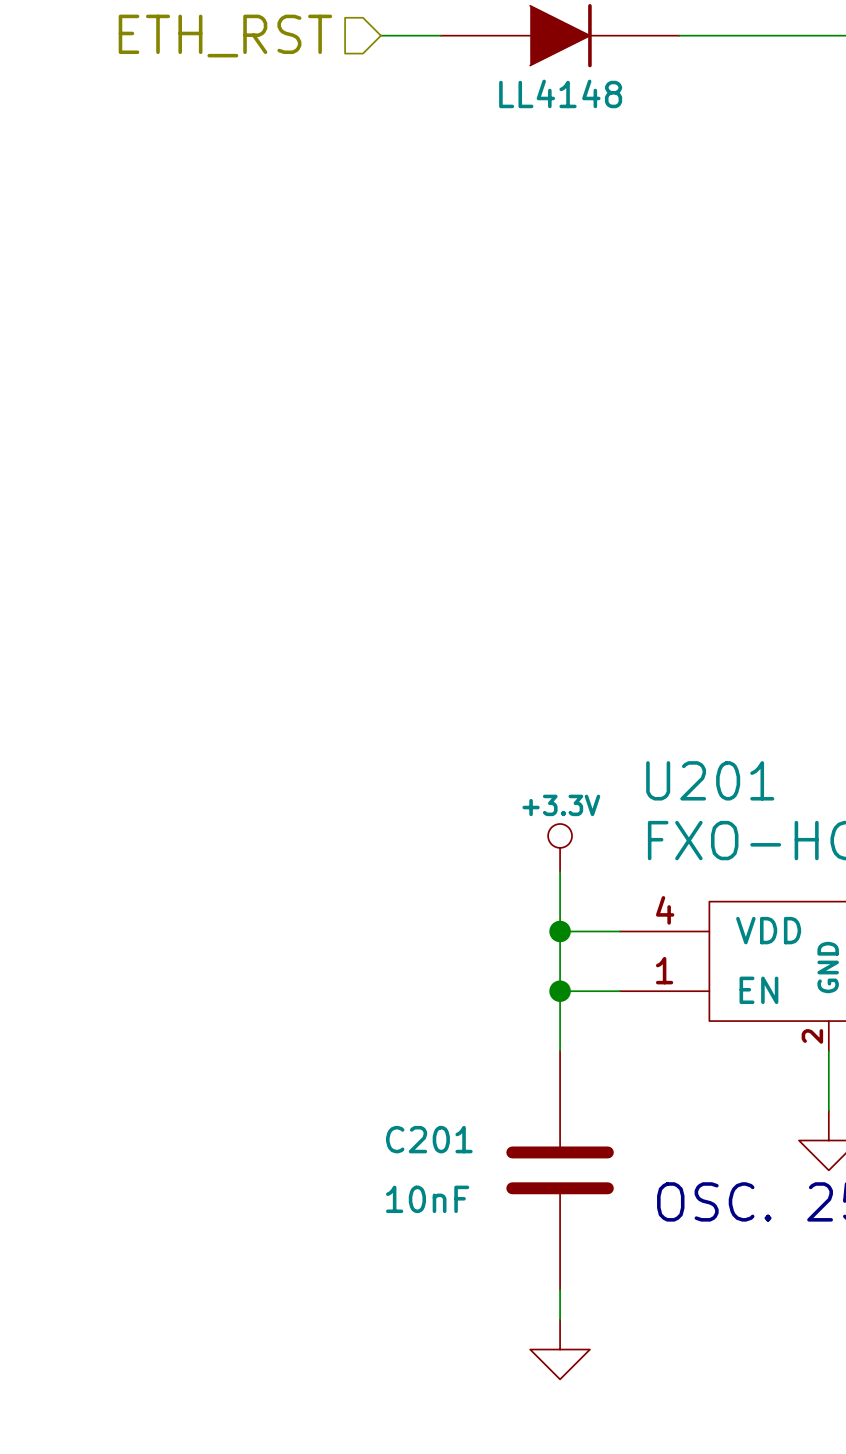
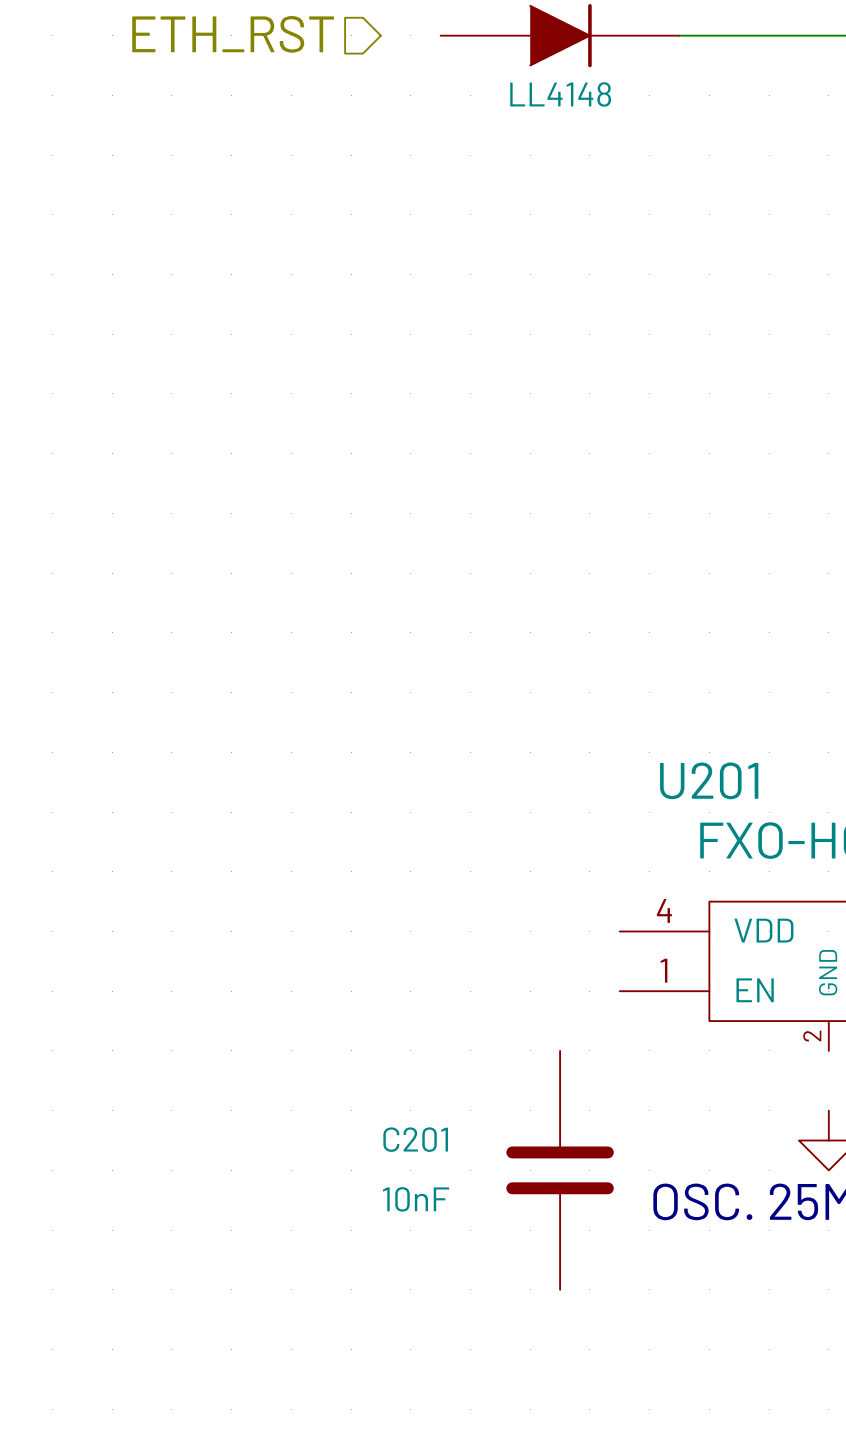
wire: (380, 35) (440, 35) -> none
power symbol: +3.3V (560, 847) -> none
wire: (560, 871) (560, 1050) -> none
wire: (560, 931) (619, 931) -> none
junction: (560, 931) -> none
wire: (560, 991) (619, 991) -> none
junction: (560, 991) -> none
wire: (828, 1050) (828, 1110) -> none
wire: (560, 1289) (560, 1319) -> none
power symbol: (560, 1349) -> none

